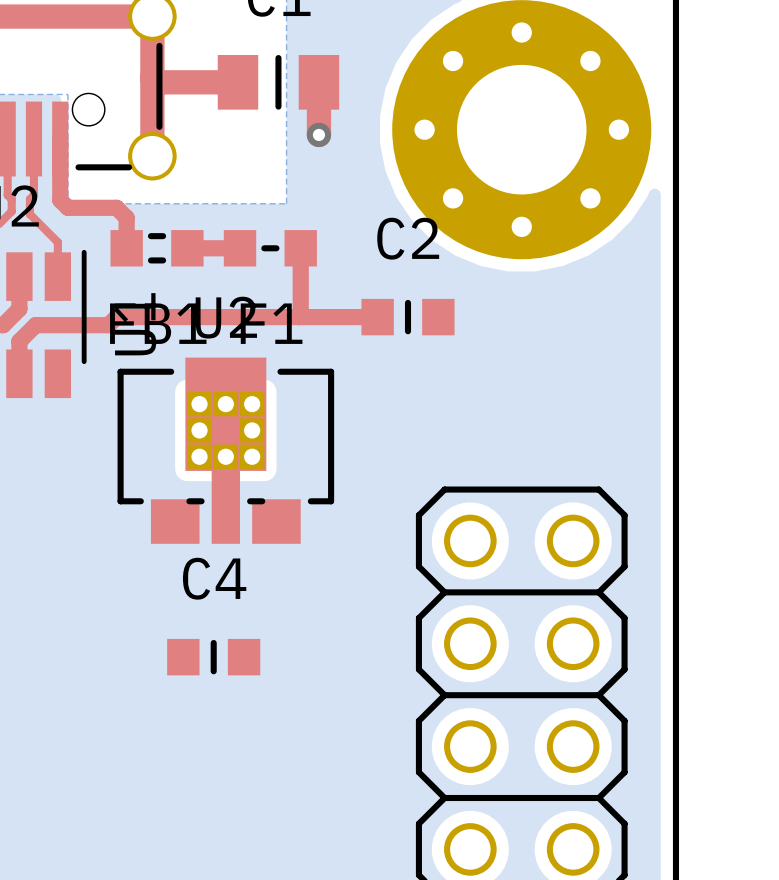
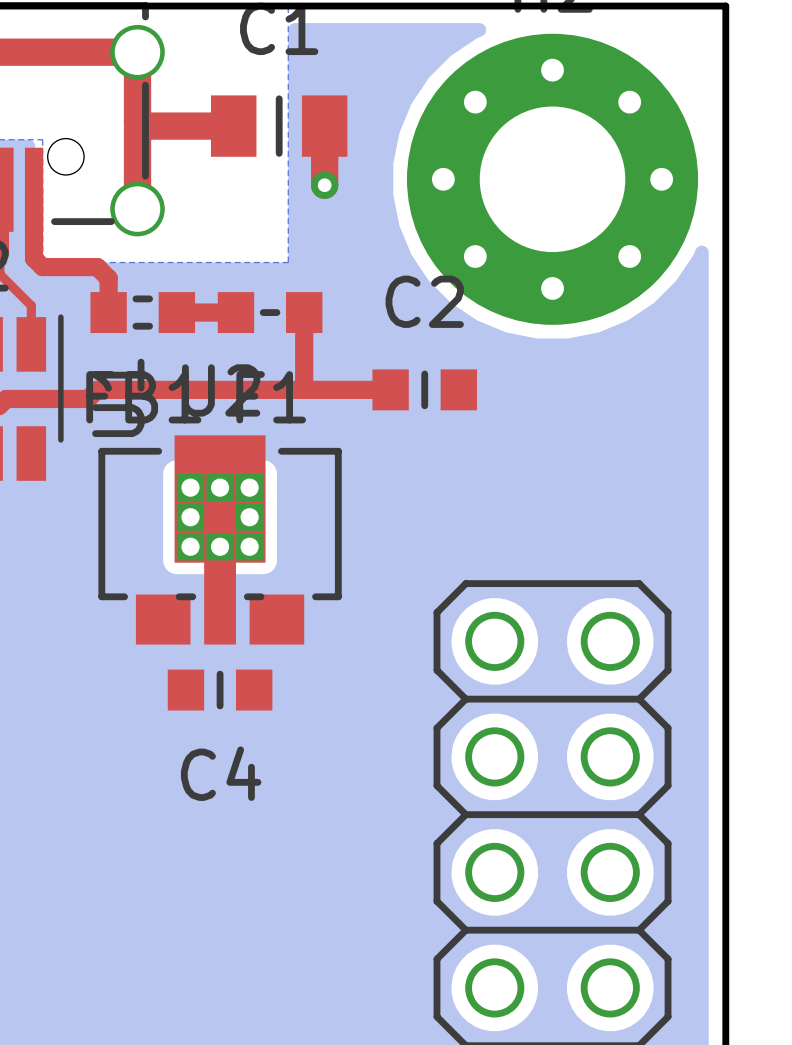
C4 name position: C4 (214, 578) -> C4 (221, 773)
C4 position: (213, 657) -> (220, 690)

